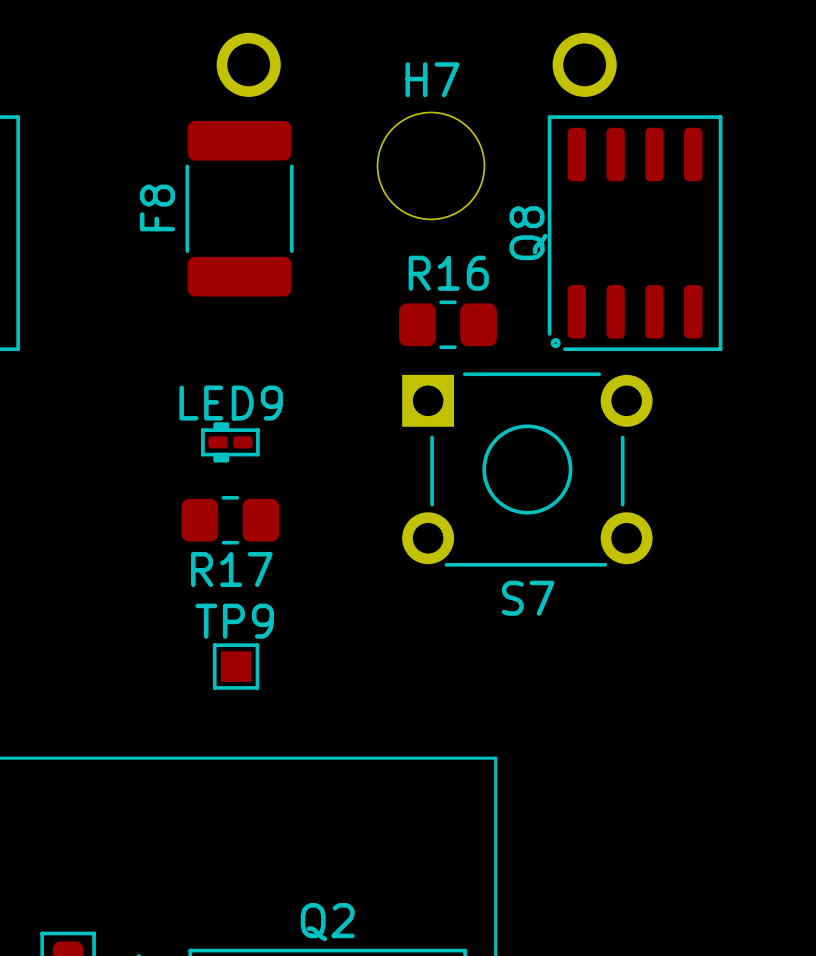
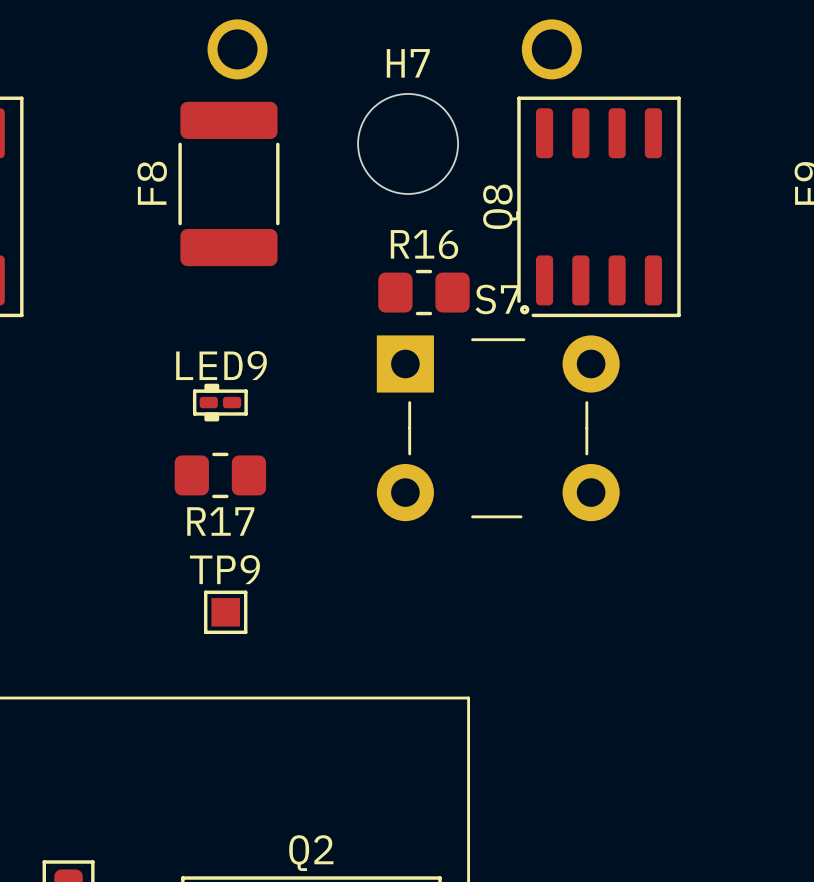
S7 footprint: [402, 372, 653, 567] -> [376, 335, 620, 522]
S7 name position: S7 (528, 598) -> S7 (497, 299)

